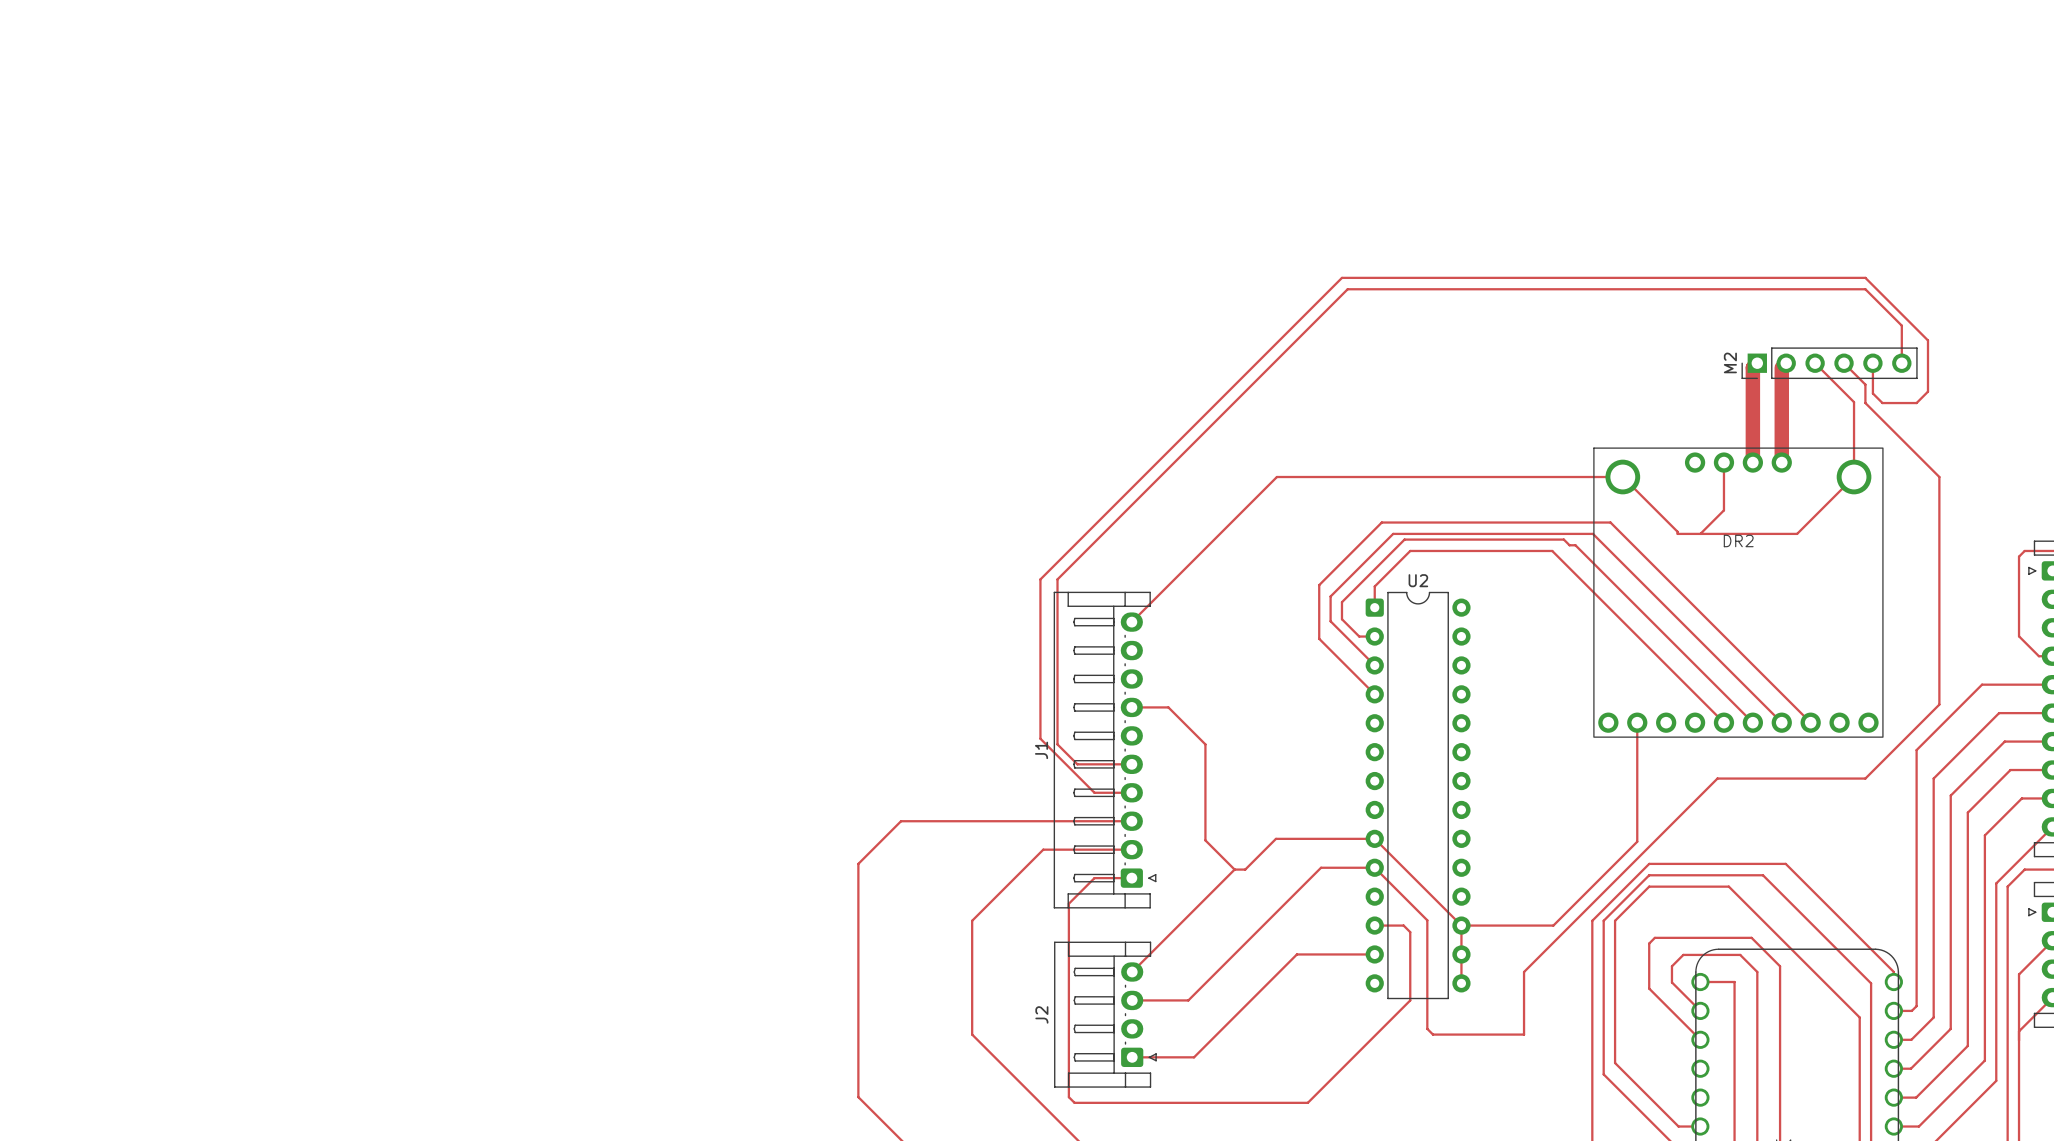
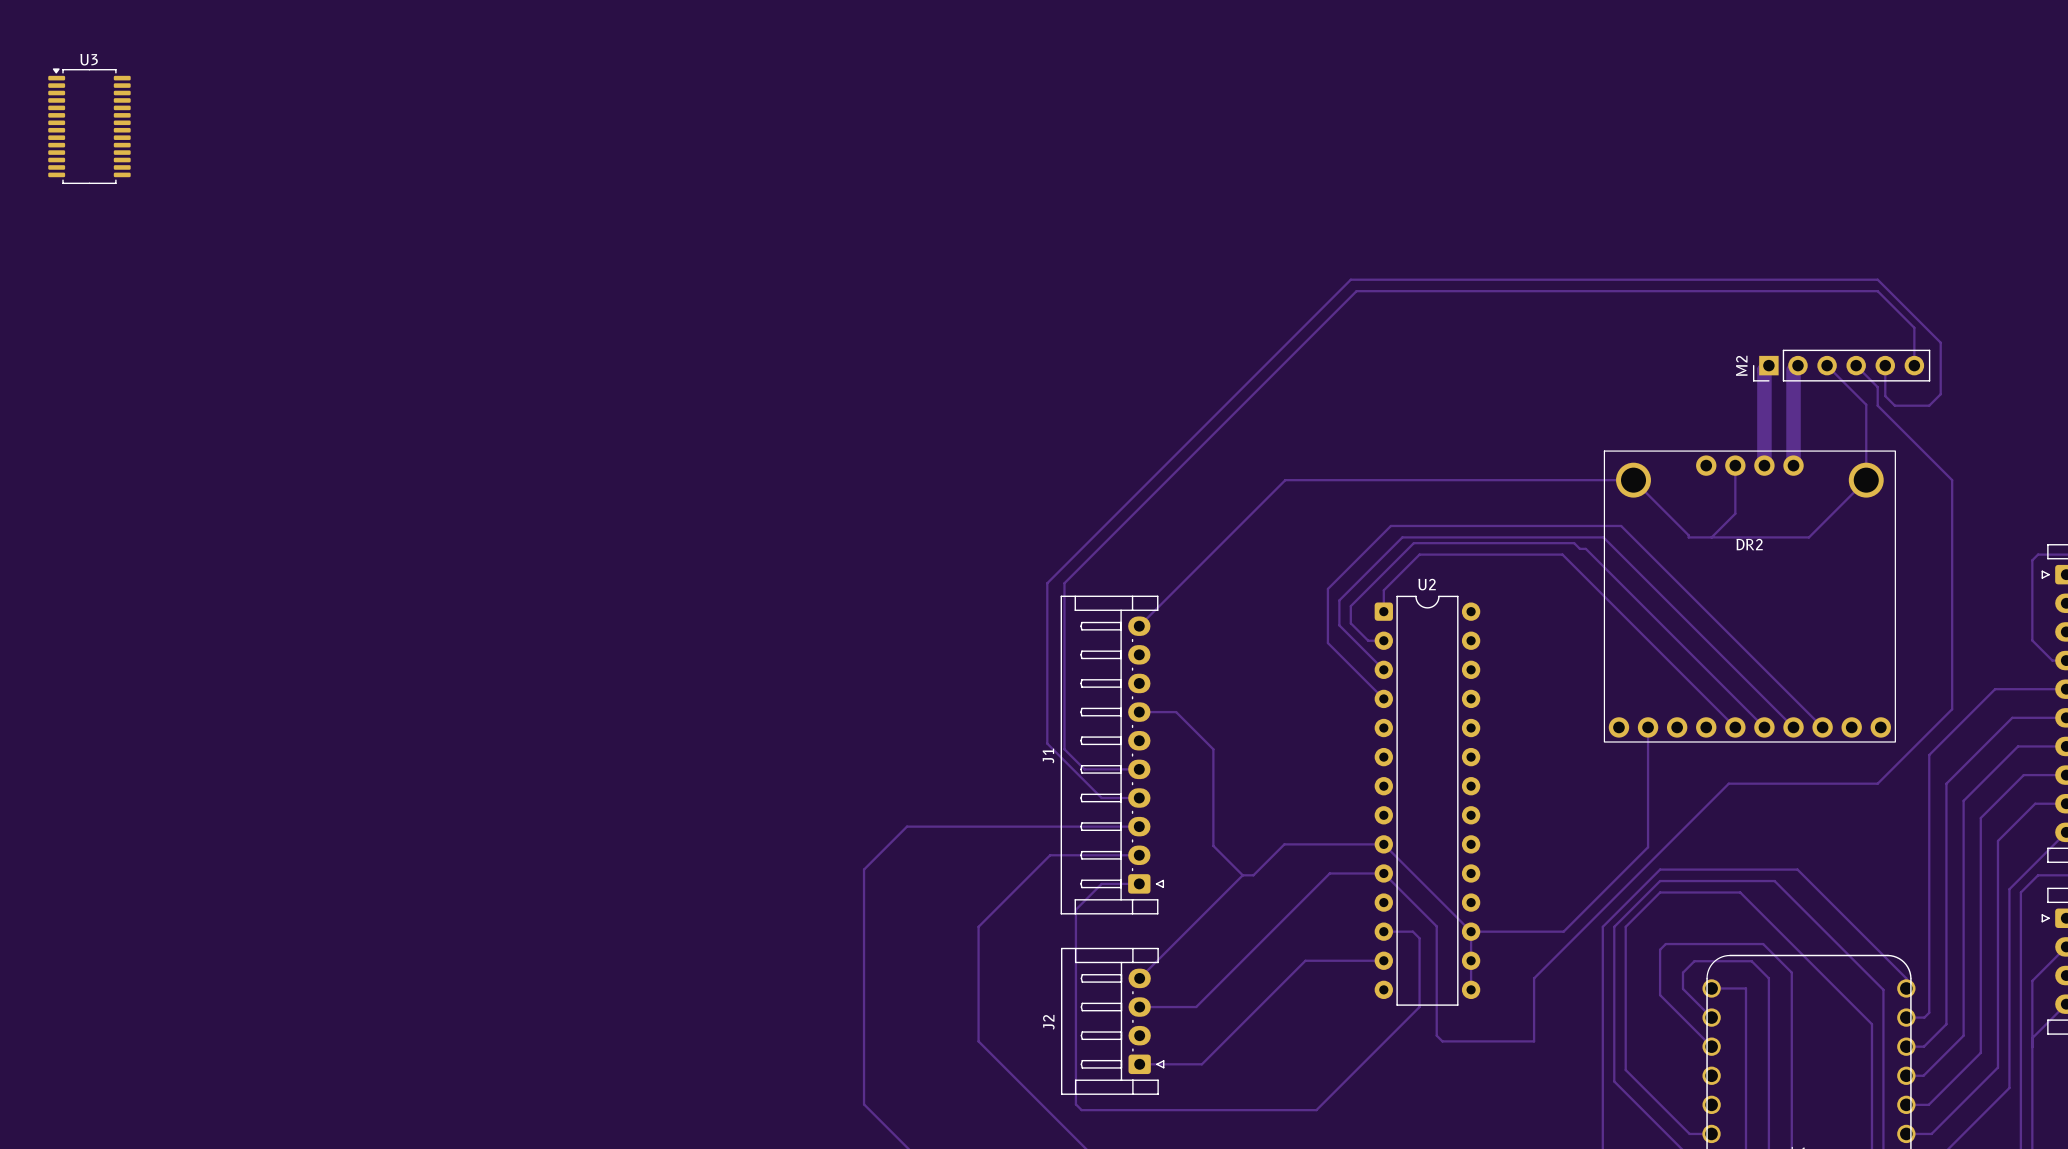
U3: none -> (89, 126)

